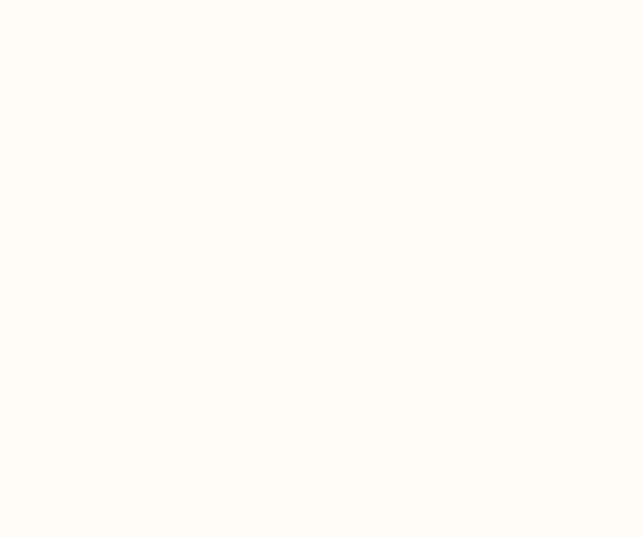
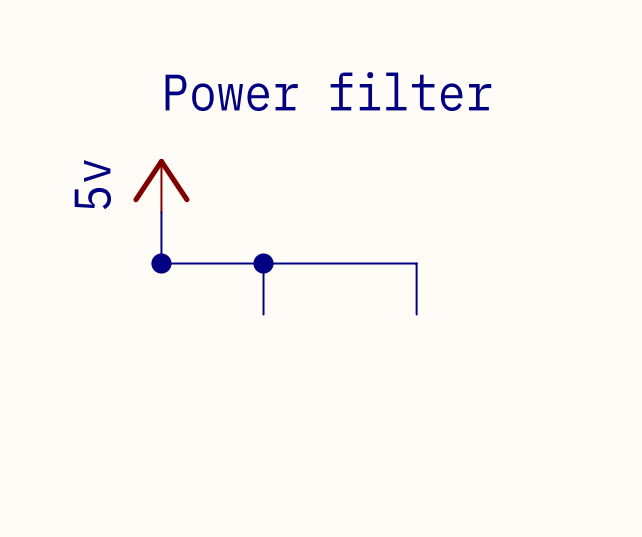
text: none -> Power filter (328, 91)
power symbol: none -> 5v (161, 185)
wire: none -> (161, 212) (161, 263) (416, 263) (416, 314)
junction: none -> (161, 263)
wire: none -> (263, 263) (263, 314)
junction: none -> (263, 263)

